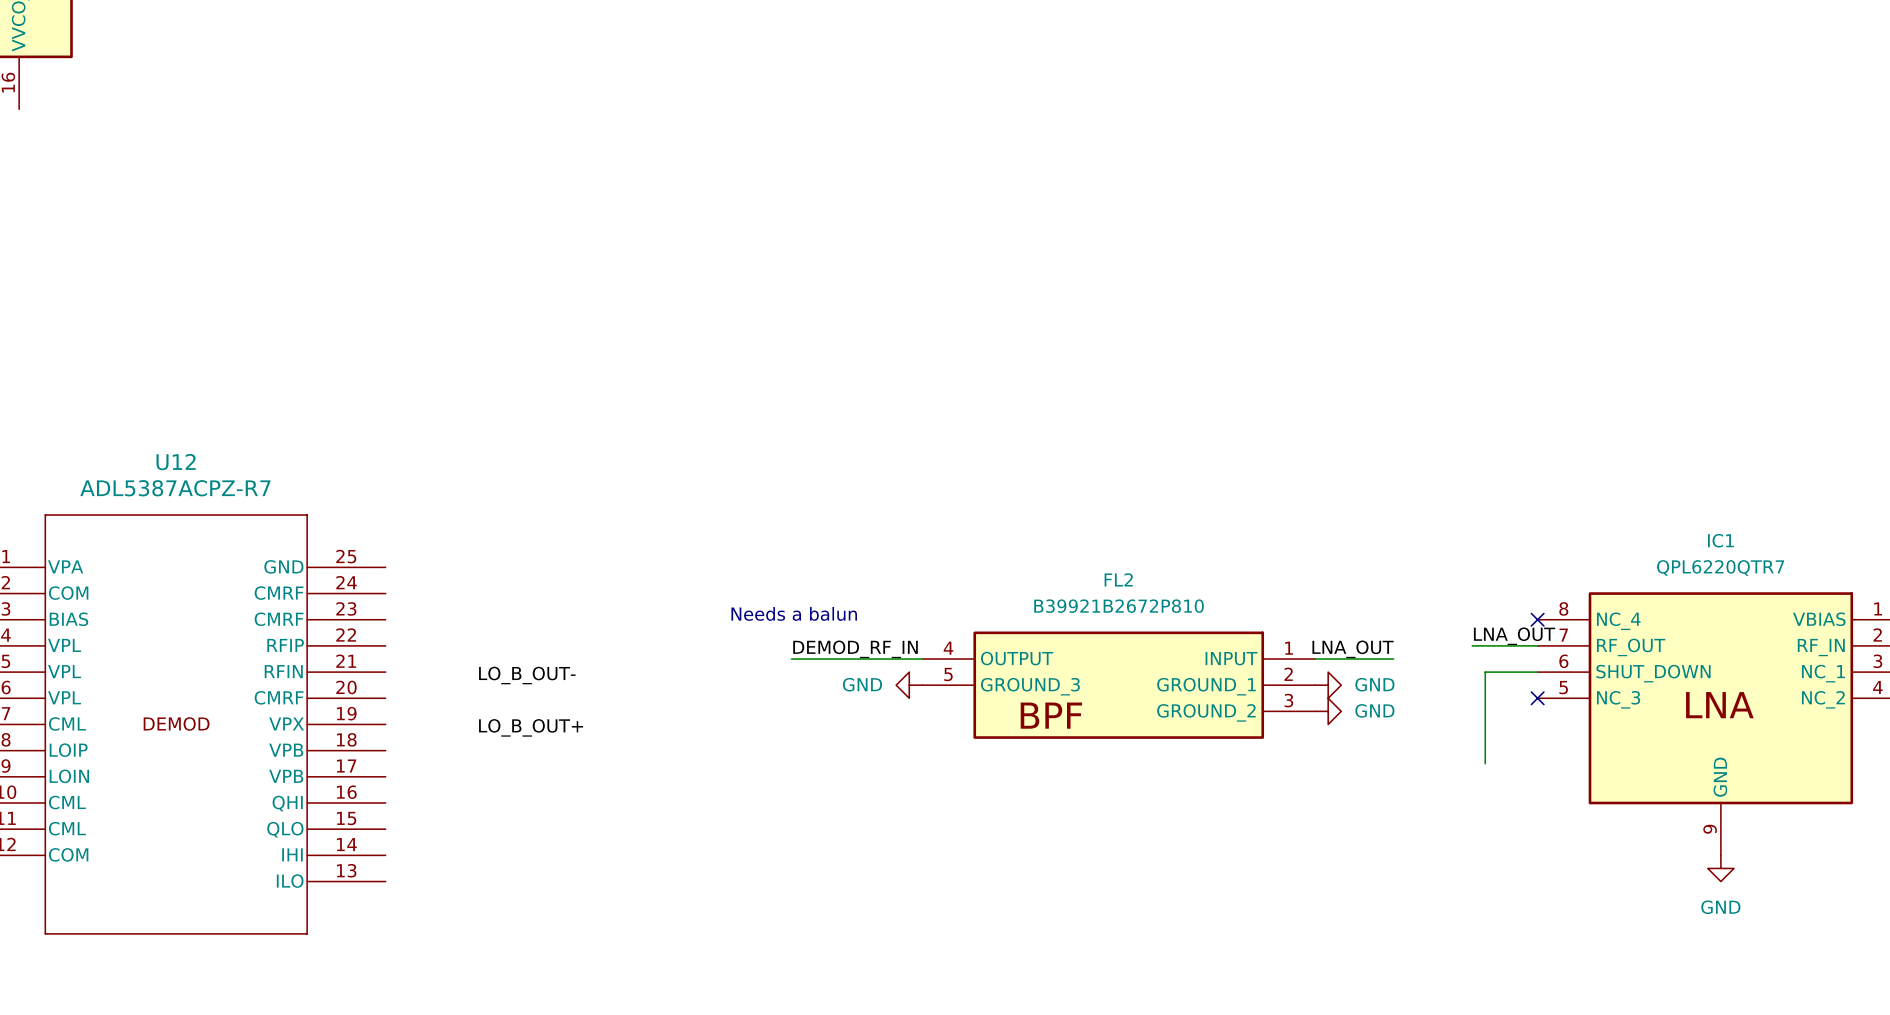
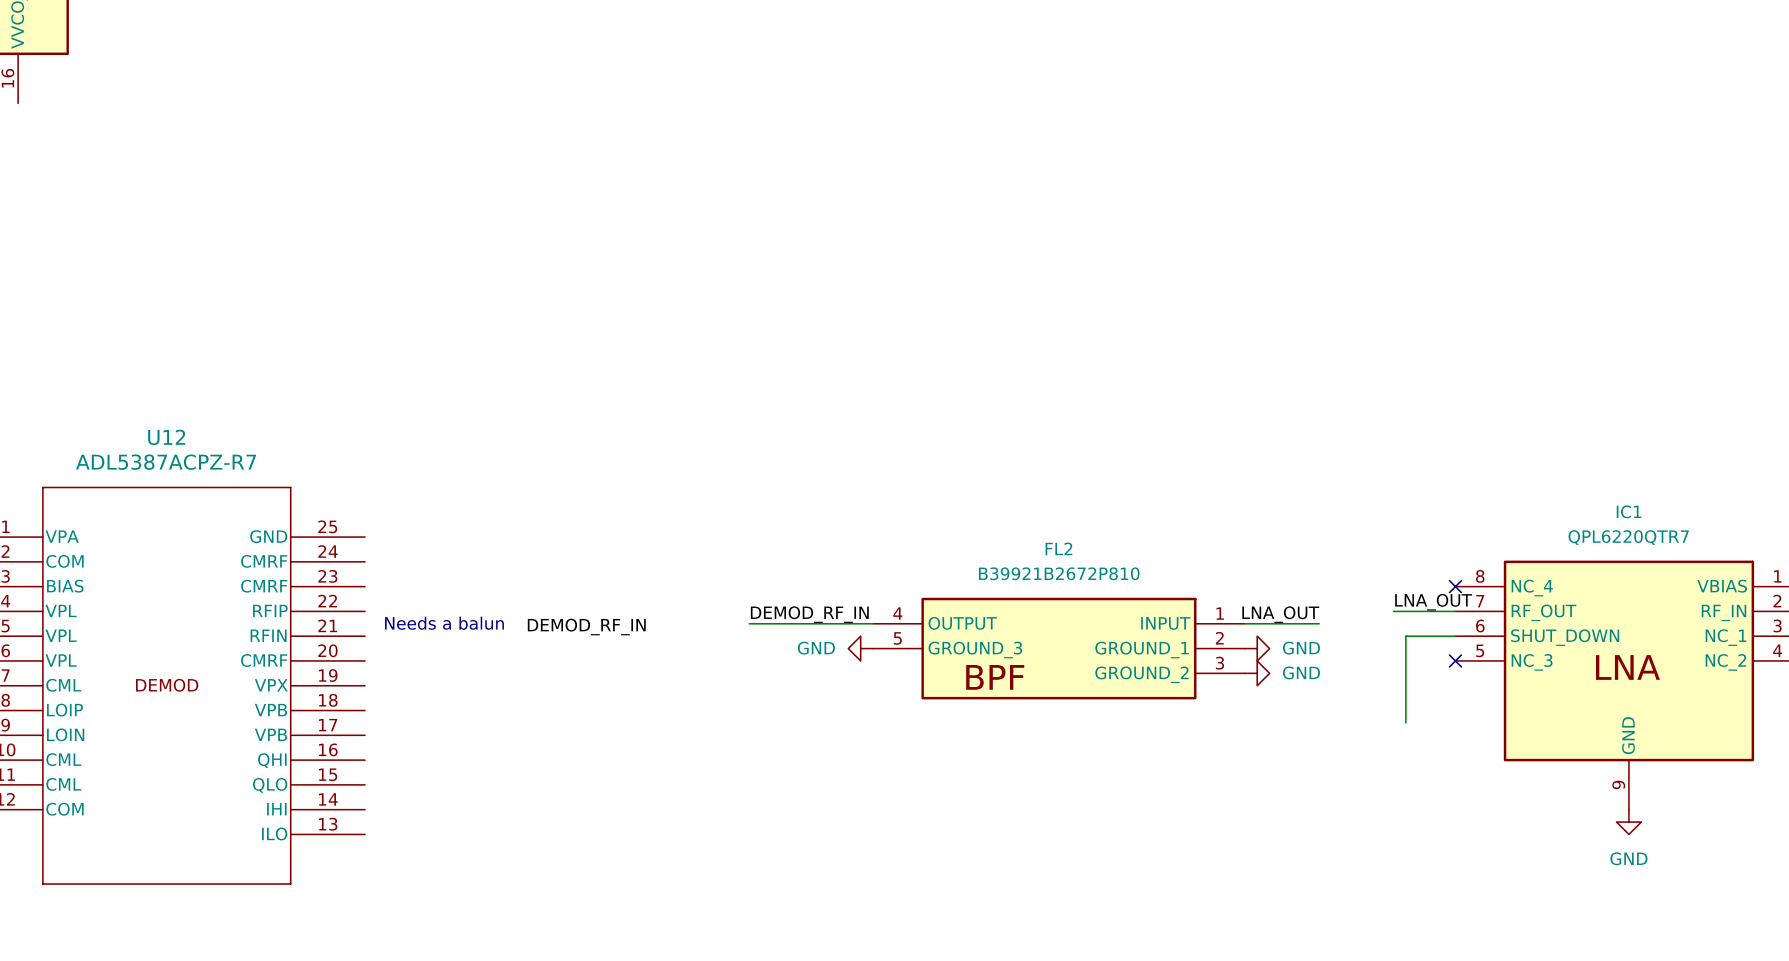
text: Needs a balun (794, 613) -> none
text: none -> Needs a balun (444, 623)
label: none -> DEMOD_RF_IN (586, 627)
label: LO_B_OUT- (527, 675) -> none
label: LO_B_OUT+ (531, 727) -> none

